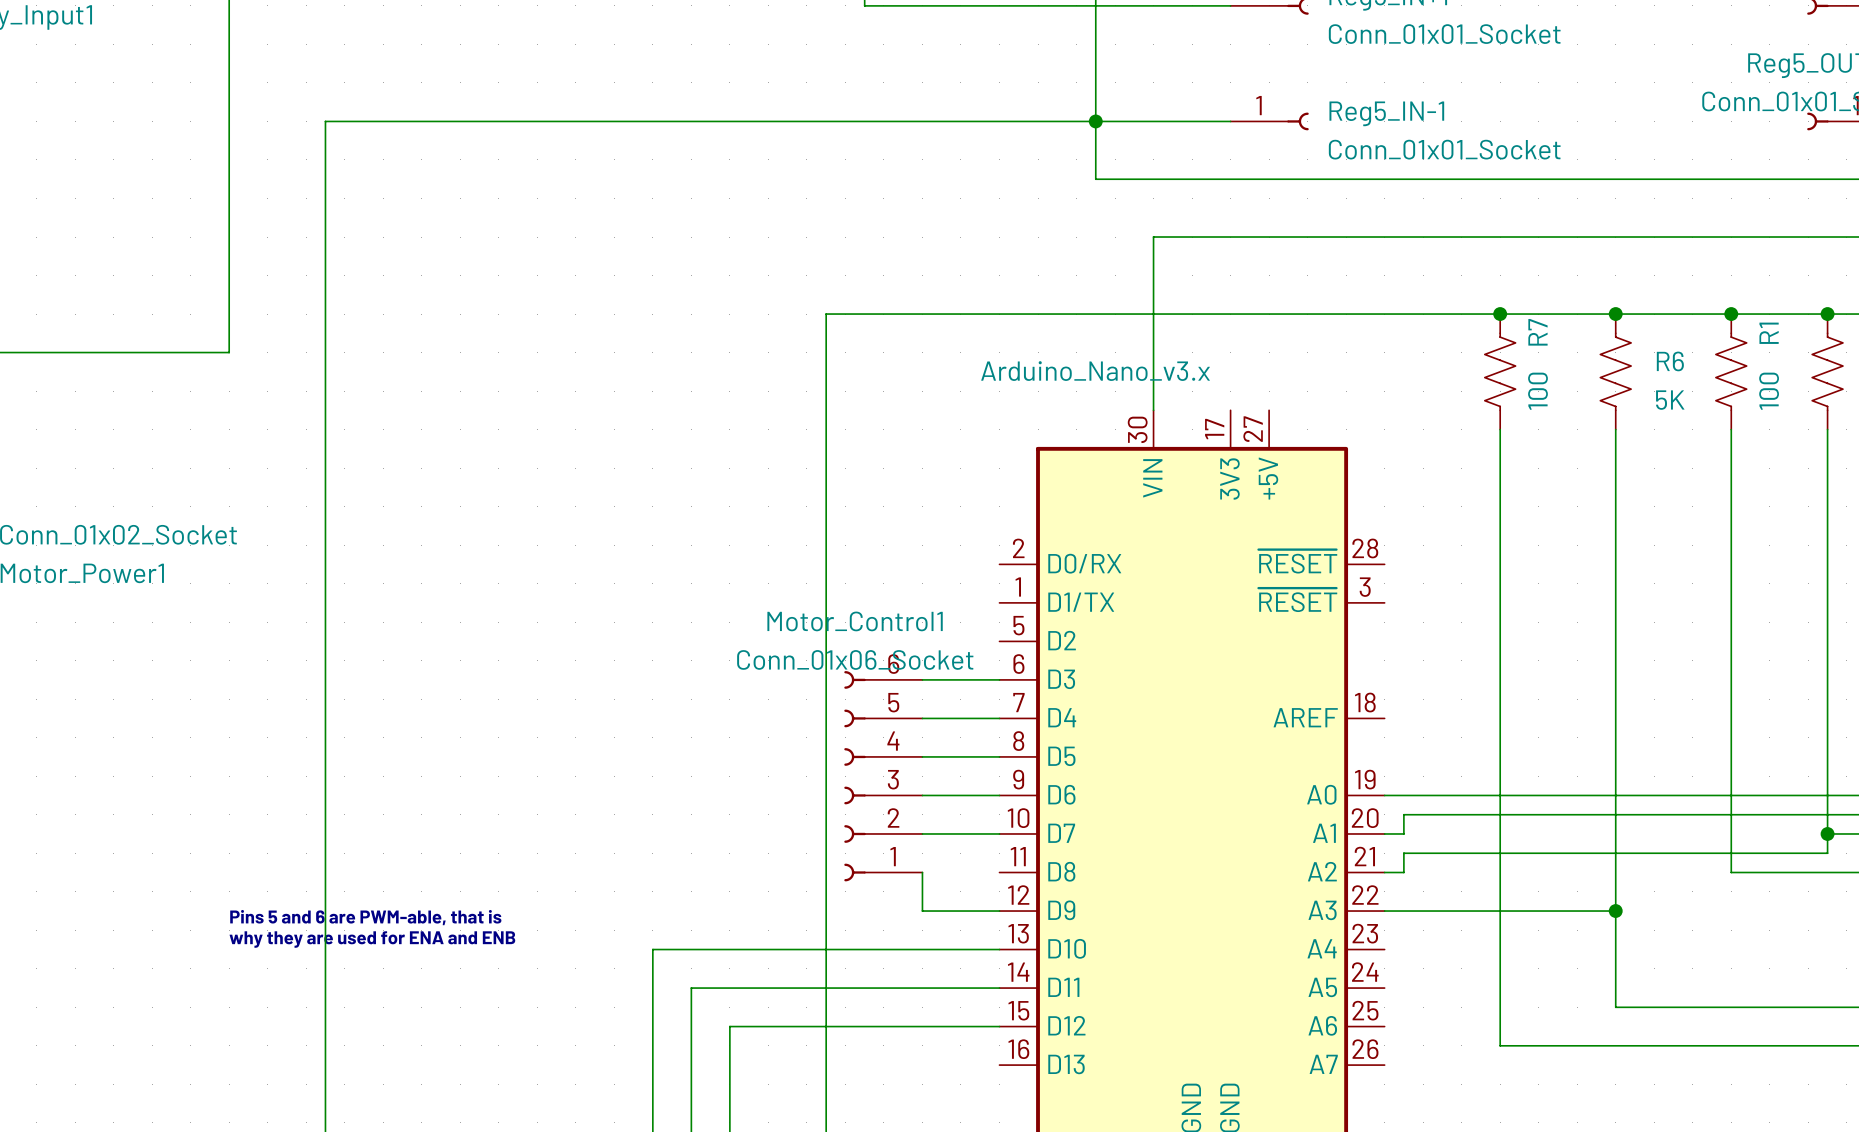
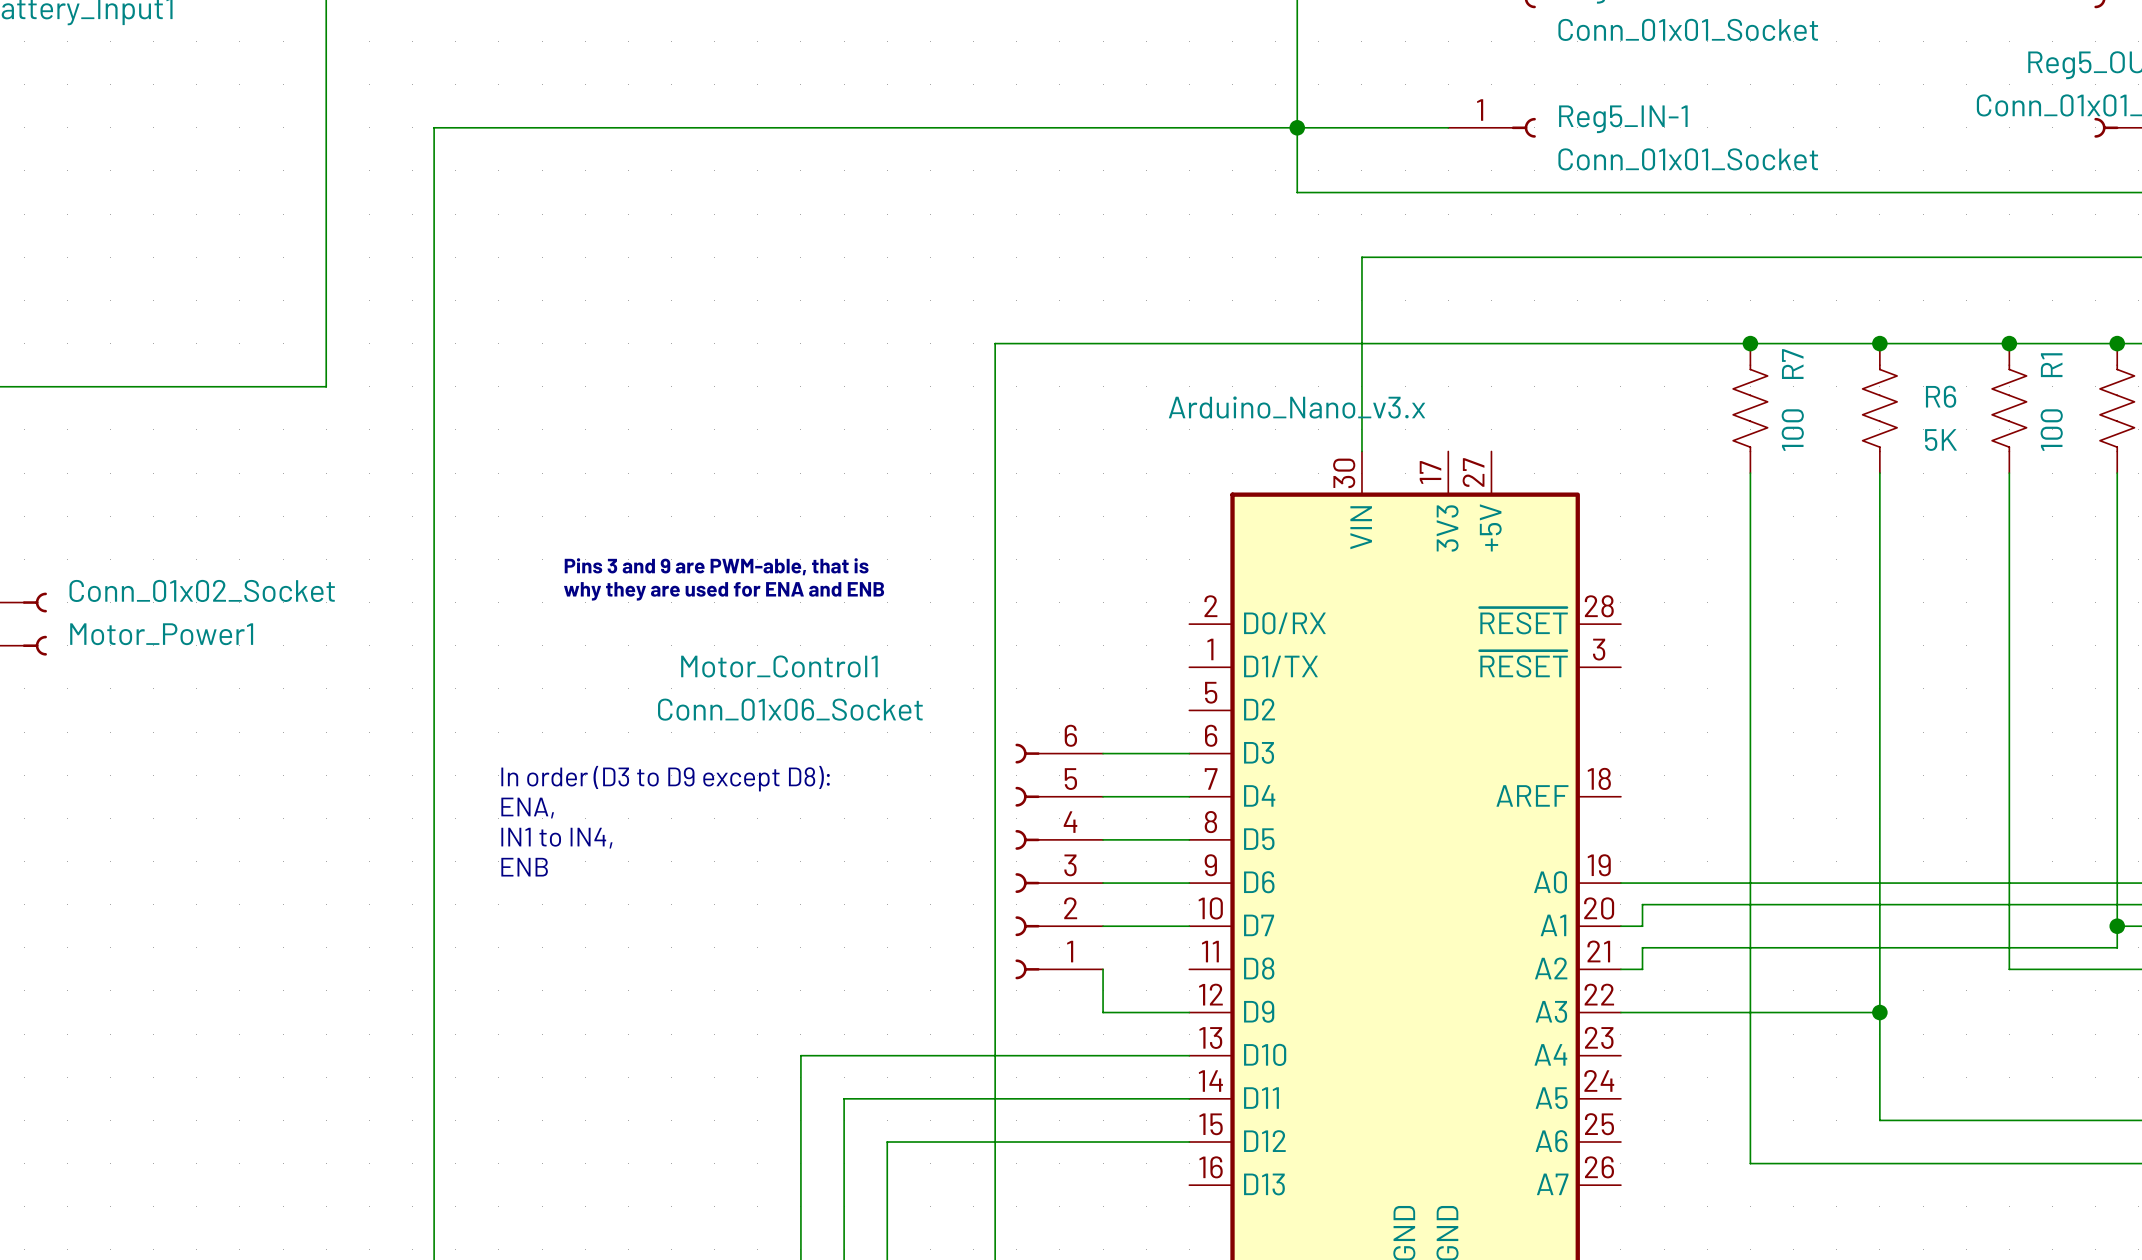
text: none -> Pins 3 and 9 are PWM-able, that is (716, 566)
text: none -> why they are used for ENA and ENB (724, 591)
Motor_Control1 name position: Motor_Control1 (855, 621) -> Motor_Control1 (779, 666)
Motor_Control1 value position: Conn_01x06_Socket (855, 659) -> Conn_01x06_Socket (790, 709)
text: none -> In order (D3 to D9 except D8): (665, 778)
text: none -> ENA, (527, 808)
text: none -> IN1 to IN4, (556, 838)
text: none -> ENB (524, 867)
text: Pins 5 and 6 are PWM-able, that is (365, 917) -> none
text: why they are used for ENA and ENB (372, 939) -> none

